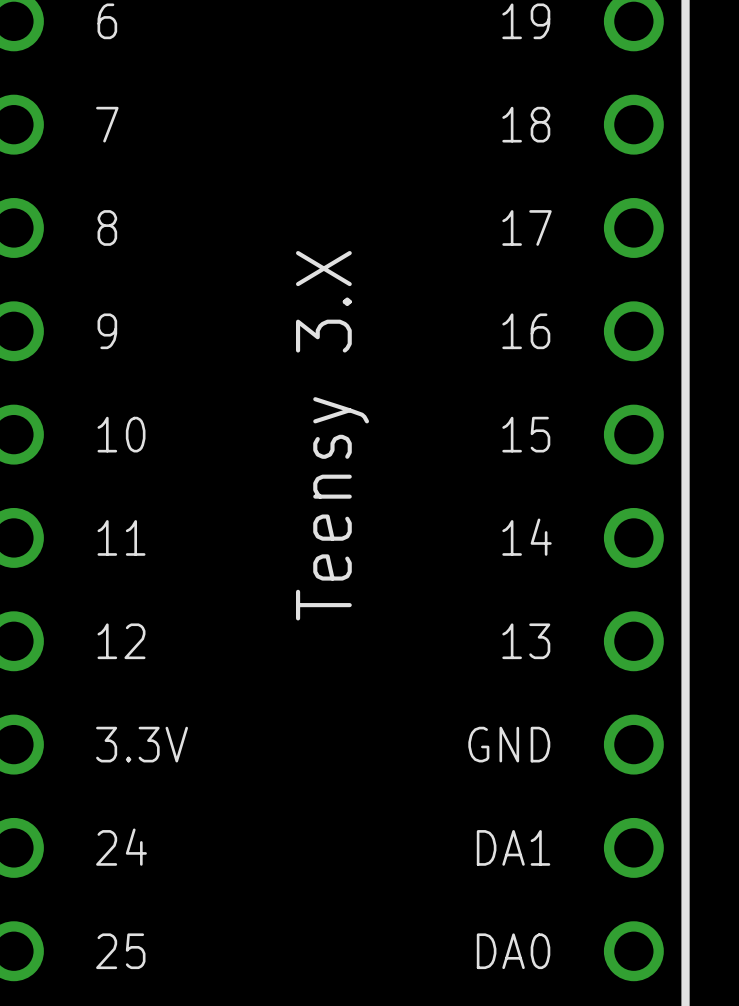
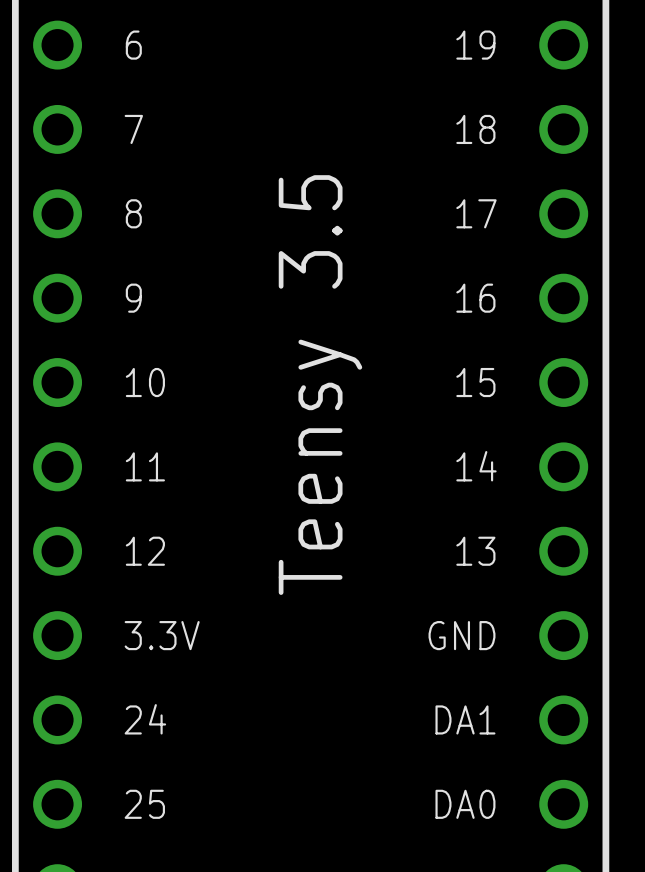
text: Teensy 3.X (332, 435) -> Teensy 3.5 (320, 385)

